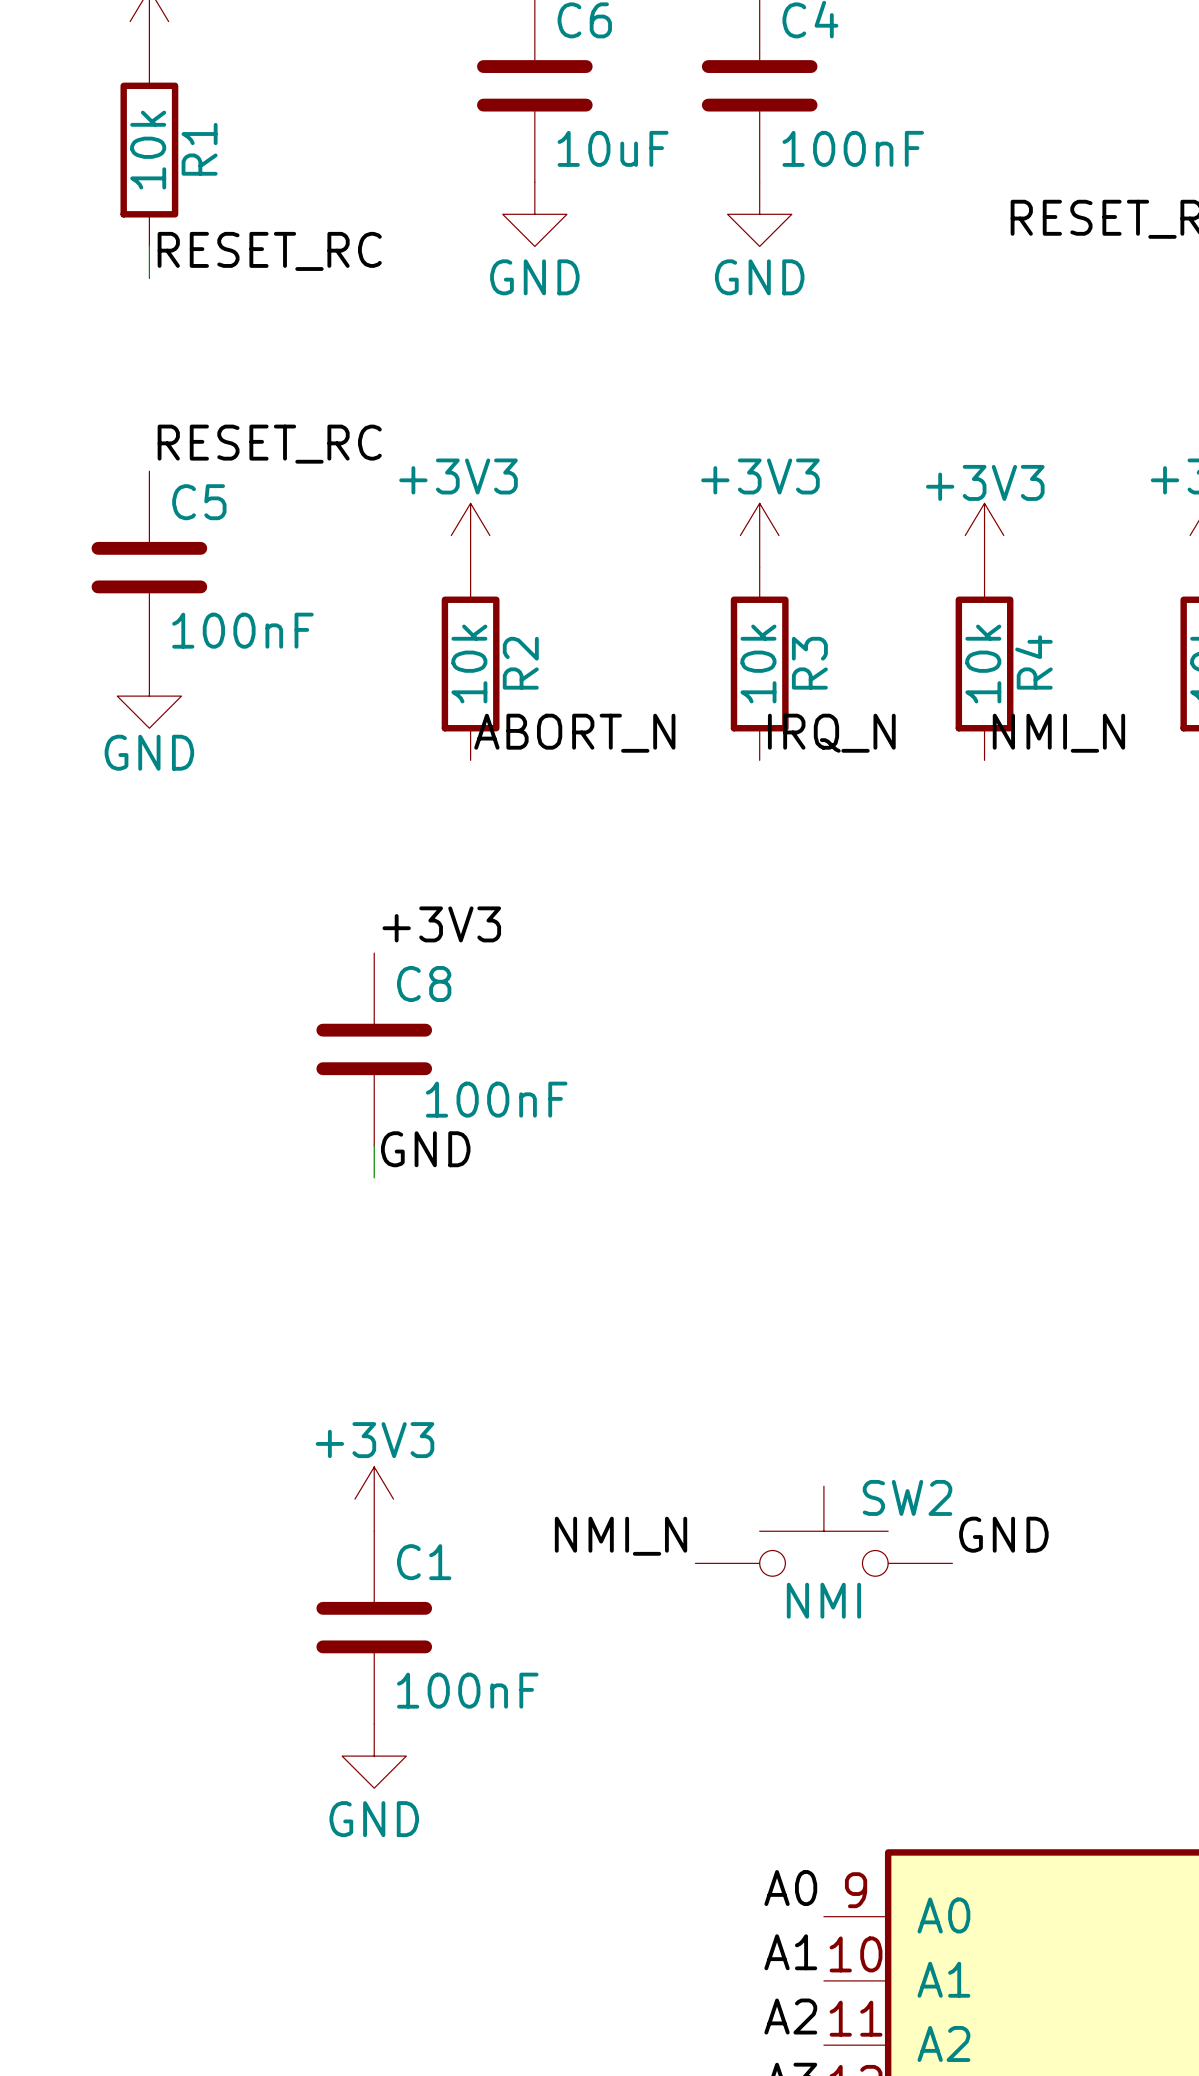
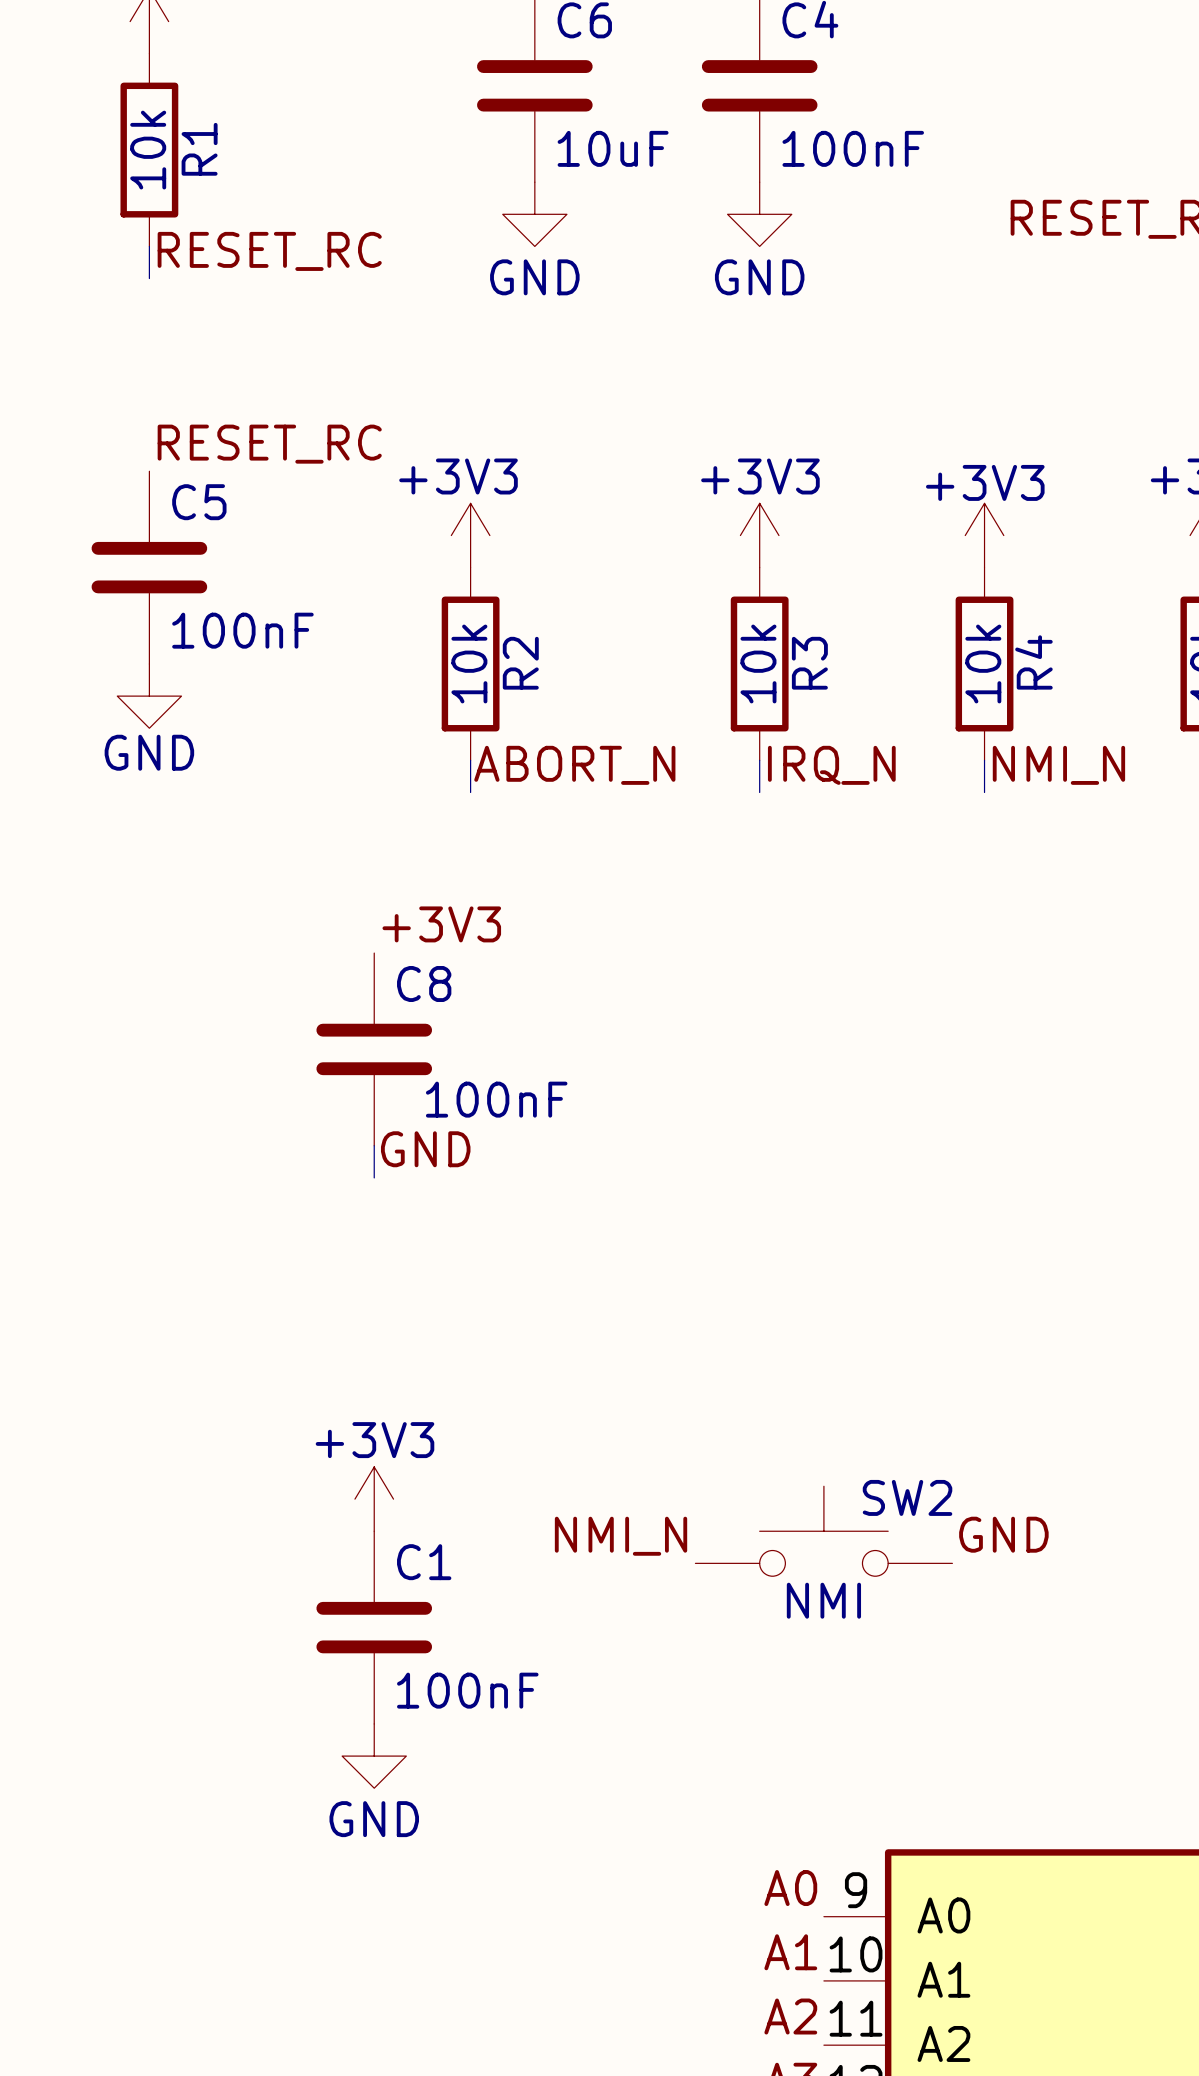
label position: ABORT_N (574, 733) -> ABORT_N (574, 765)
label position: IRQ_N (831, 733) -> IRQ_N (831, 765)
label position: NMI_N (1058, 733) -> NMI_N (1058, 765)
wire: none -> (470, 760) (470, 792)
wire: none -> (759, 760) (759, 792)
wire: none -> (984, 760) (984, 792)

